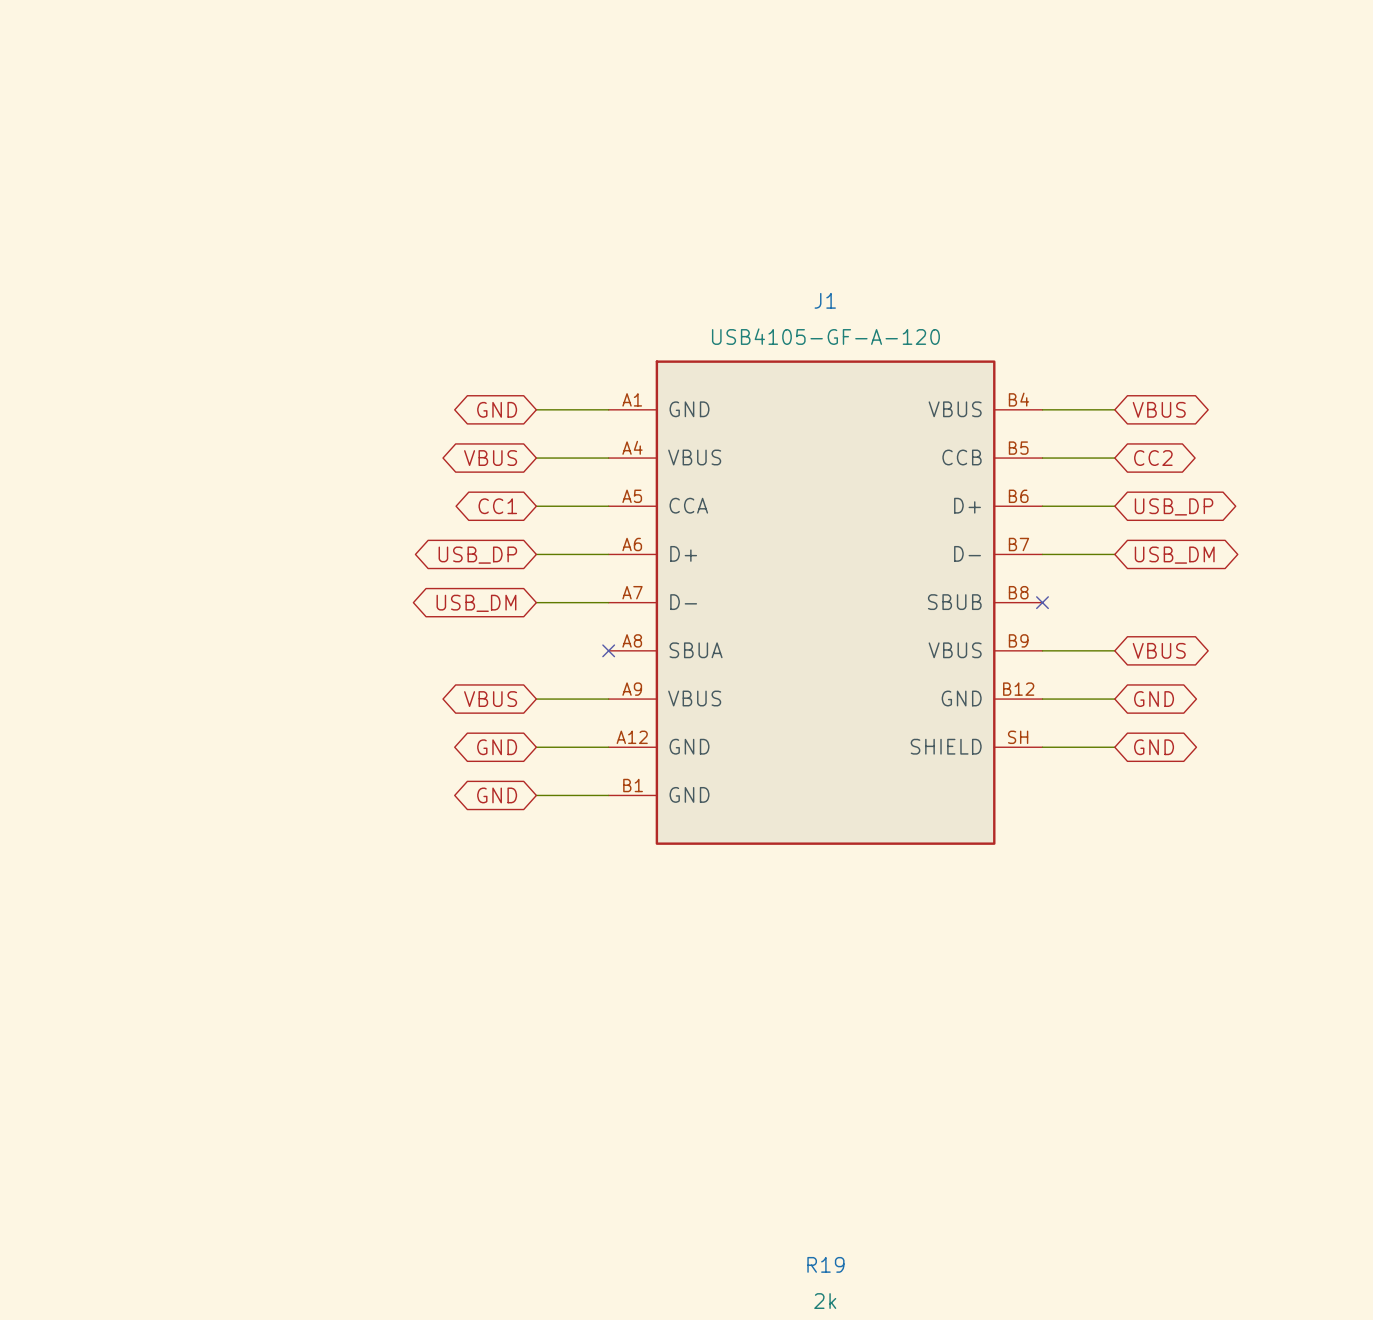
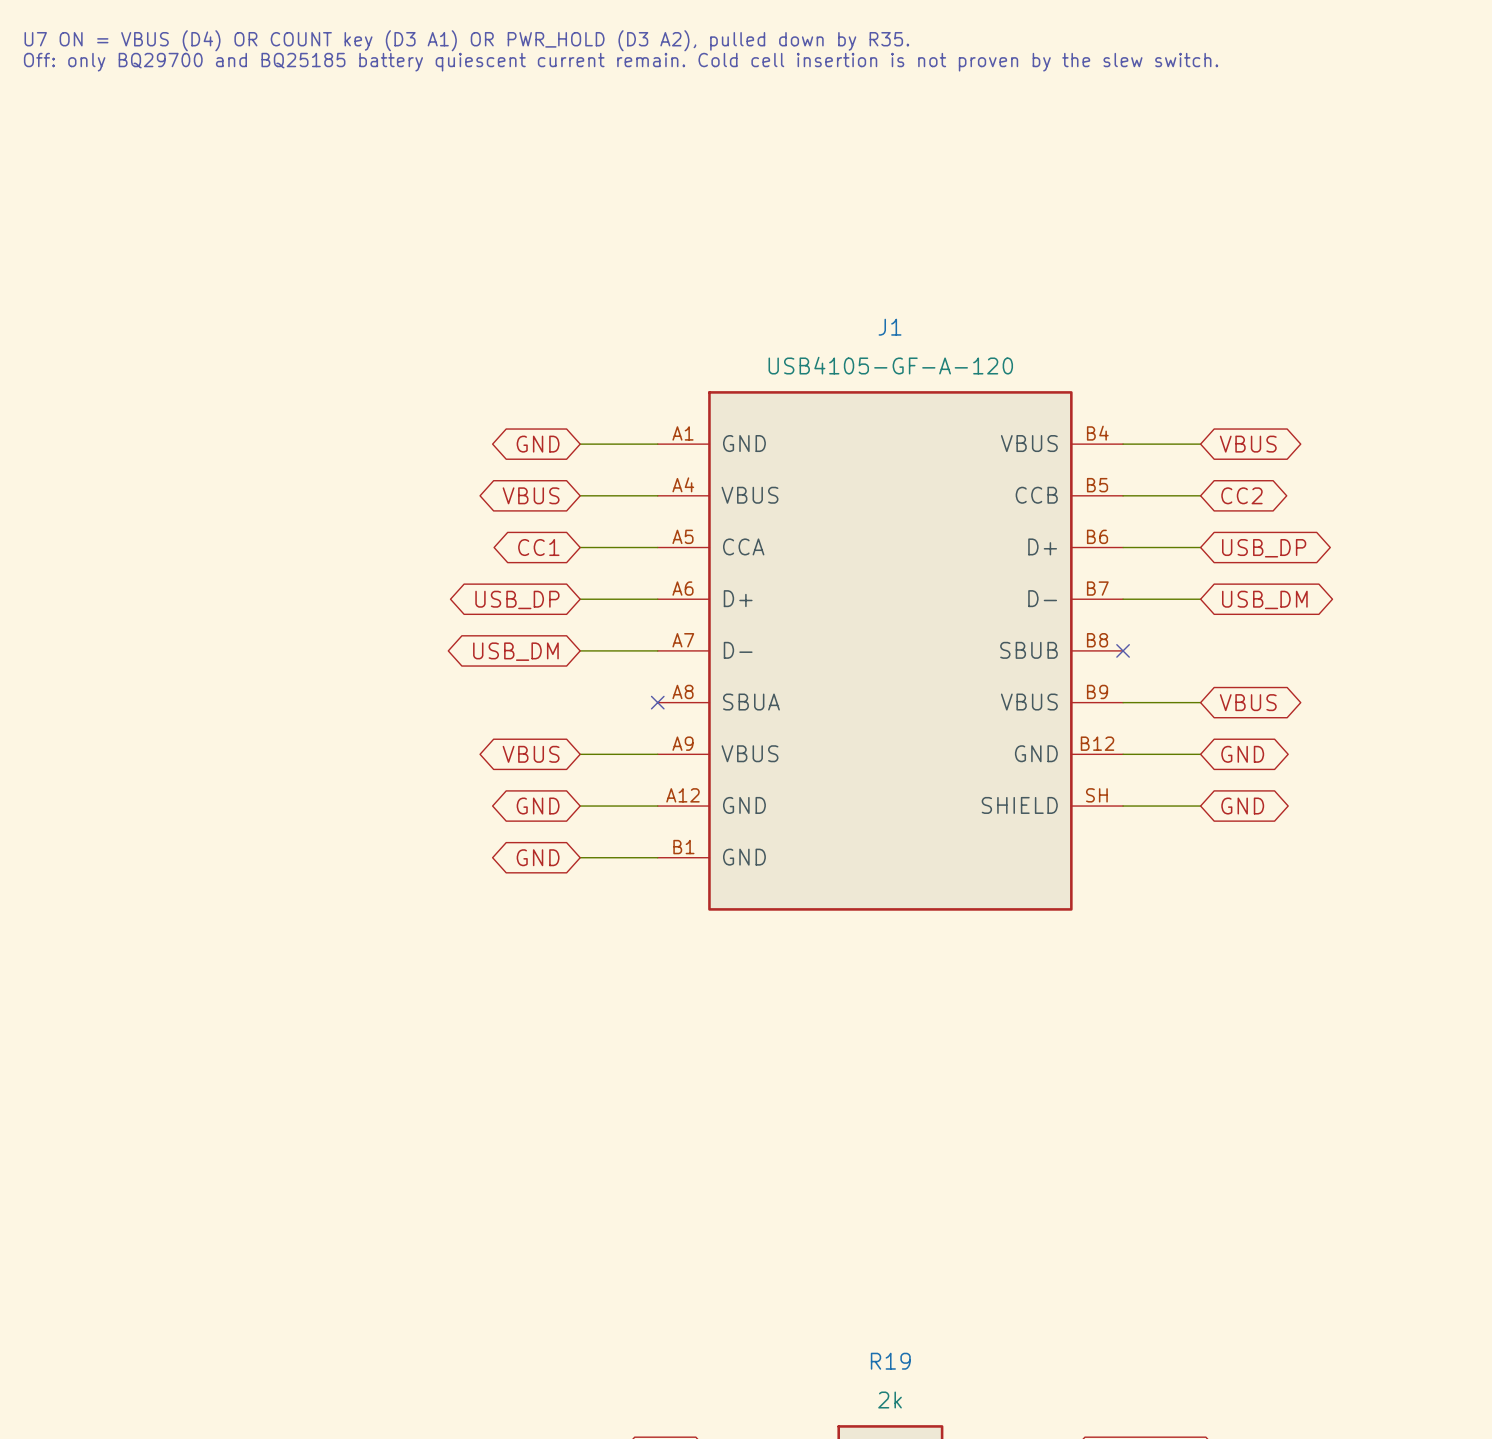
text: none -> U7 ON = VBUS (D4) OR COUNT key (D3 A1) OR PWR_HOLD (D3 A2), pulled down by R35. (466, 40)
text: none -> Off: only BQ29700 and BQ25185 battery quiescent current remain. Cold cell insertion is not proven by the slew switch. (621, 62)

